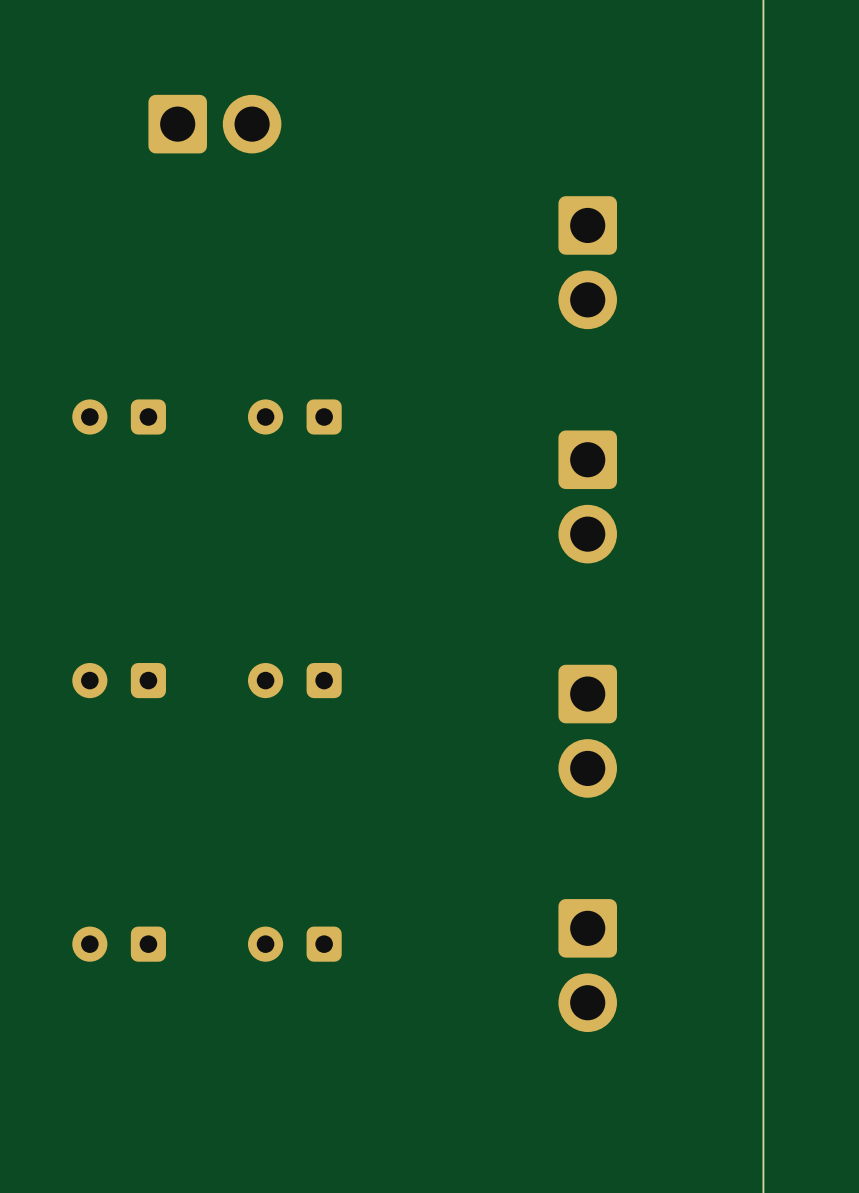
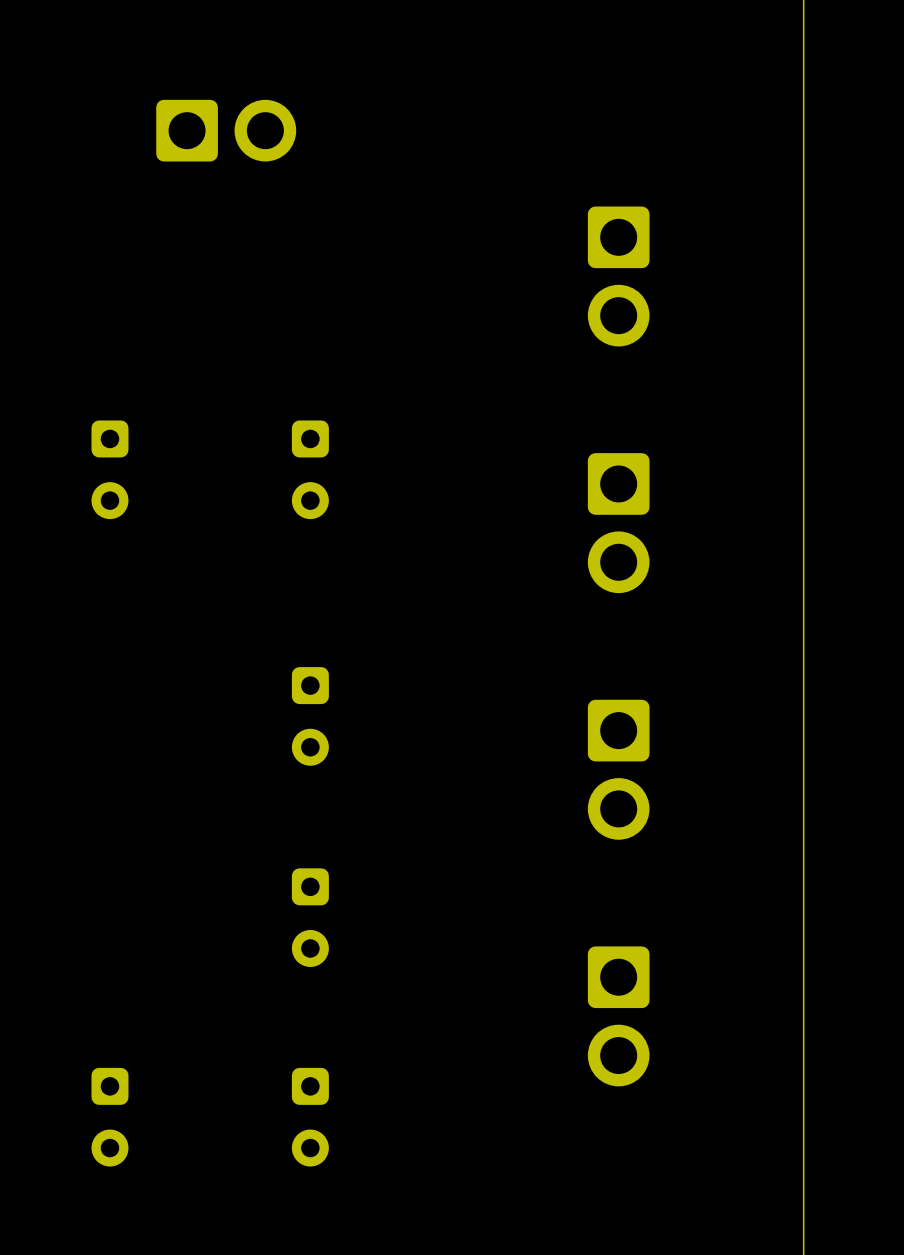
part rotation: 0° (119, 416) -> 90° counterclockwise (109, 469)
part rotation: 0° (294, 416) -> 90° counterclockwise (310, 469)
part: (119, 680) -> none
part rotation: 0° (294, 680) -> 90° counterclockwise (310, 716)
part: none -> (310, 917)
part: (119, 944) -> none
part: (294, 944) -> none
part: none -> (109, 1117)
part: none -> (310, 1117)

